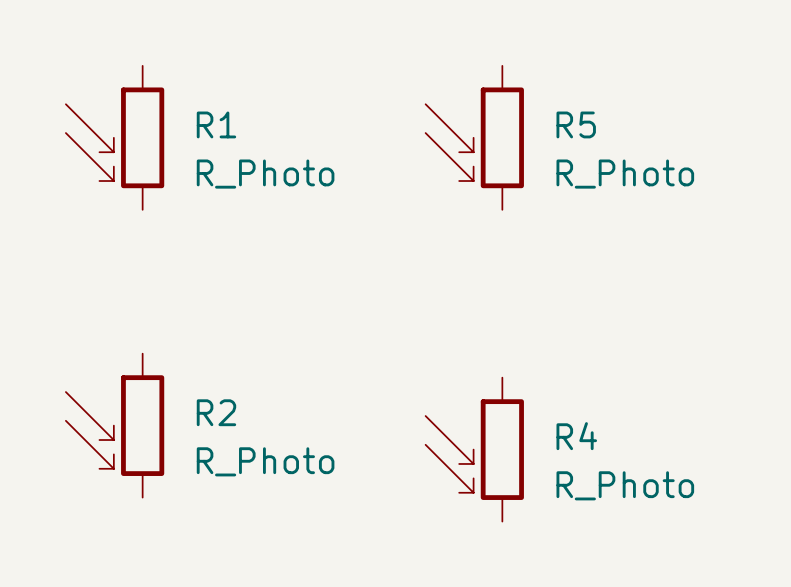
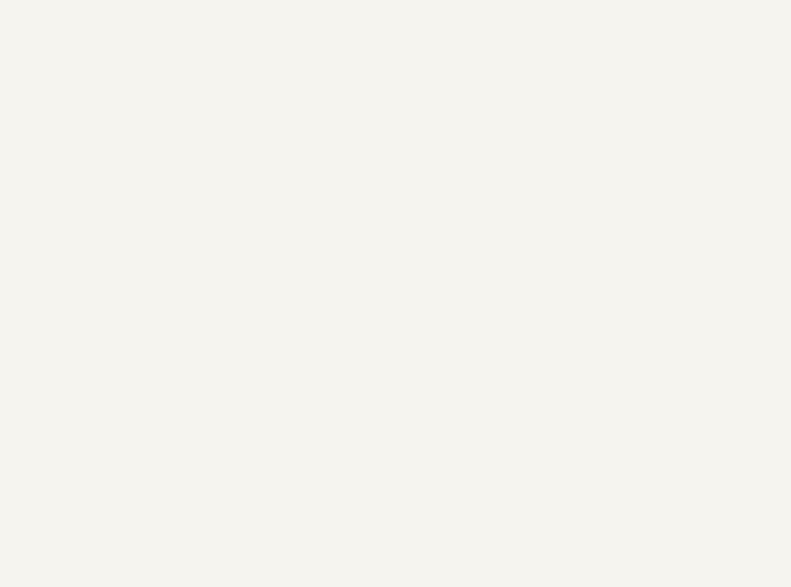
R1: R_Photo (115, 137) -> none
R5: R_Photo (474, 137) -> none
R2: R_Photo (115, 425) -> none
R4: R_Photo (474, 449) -> none

